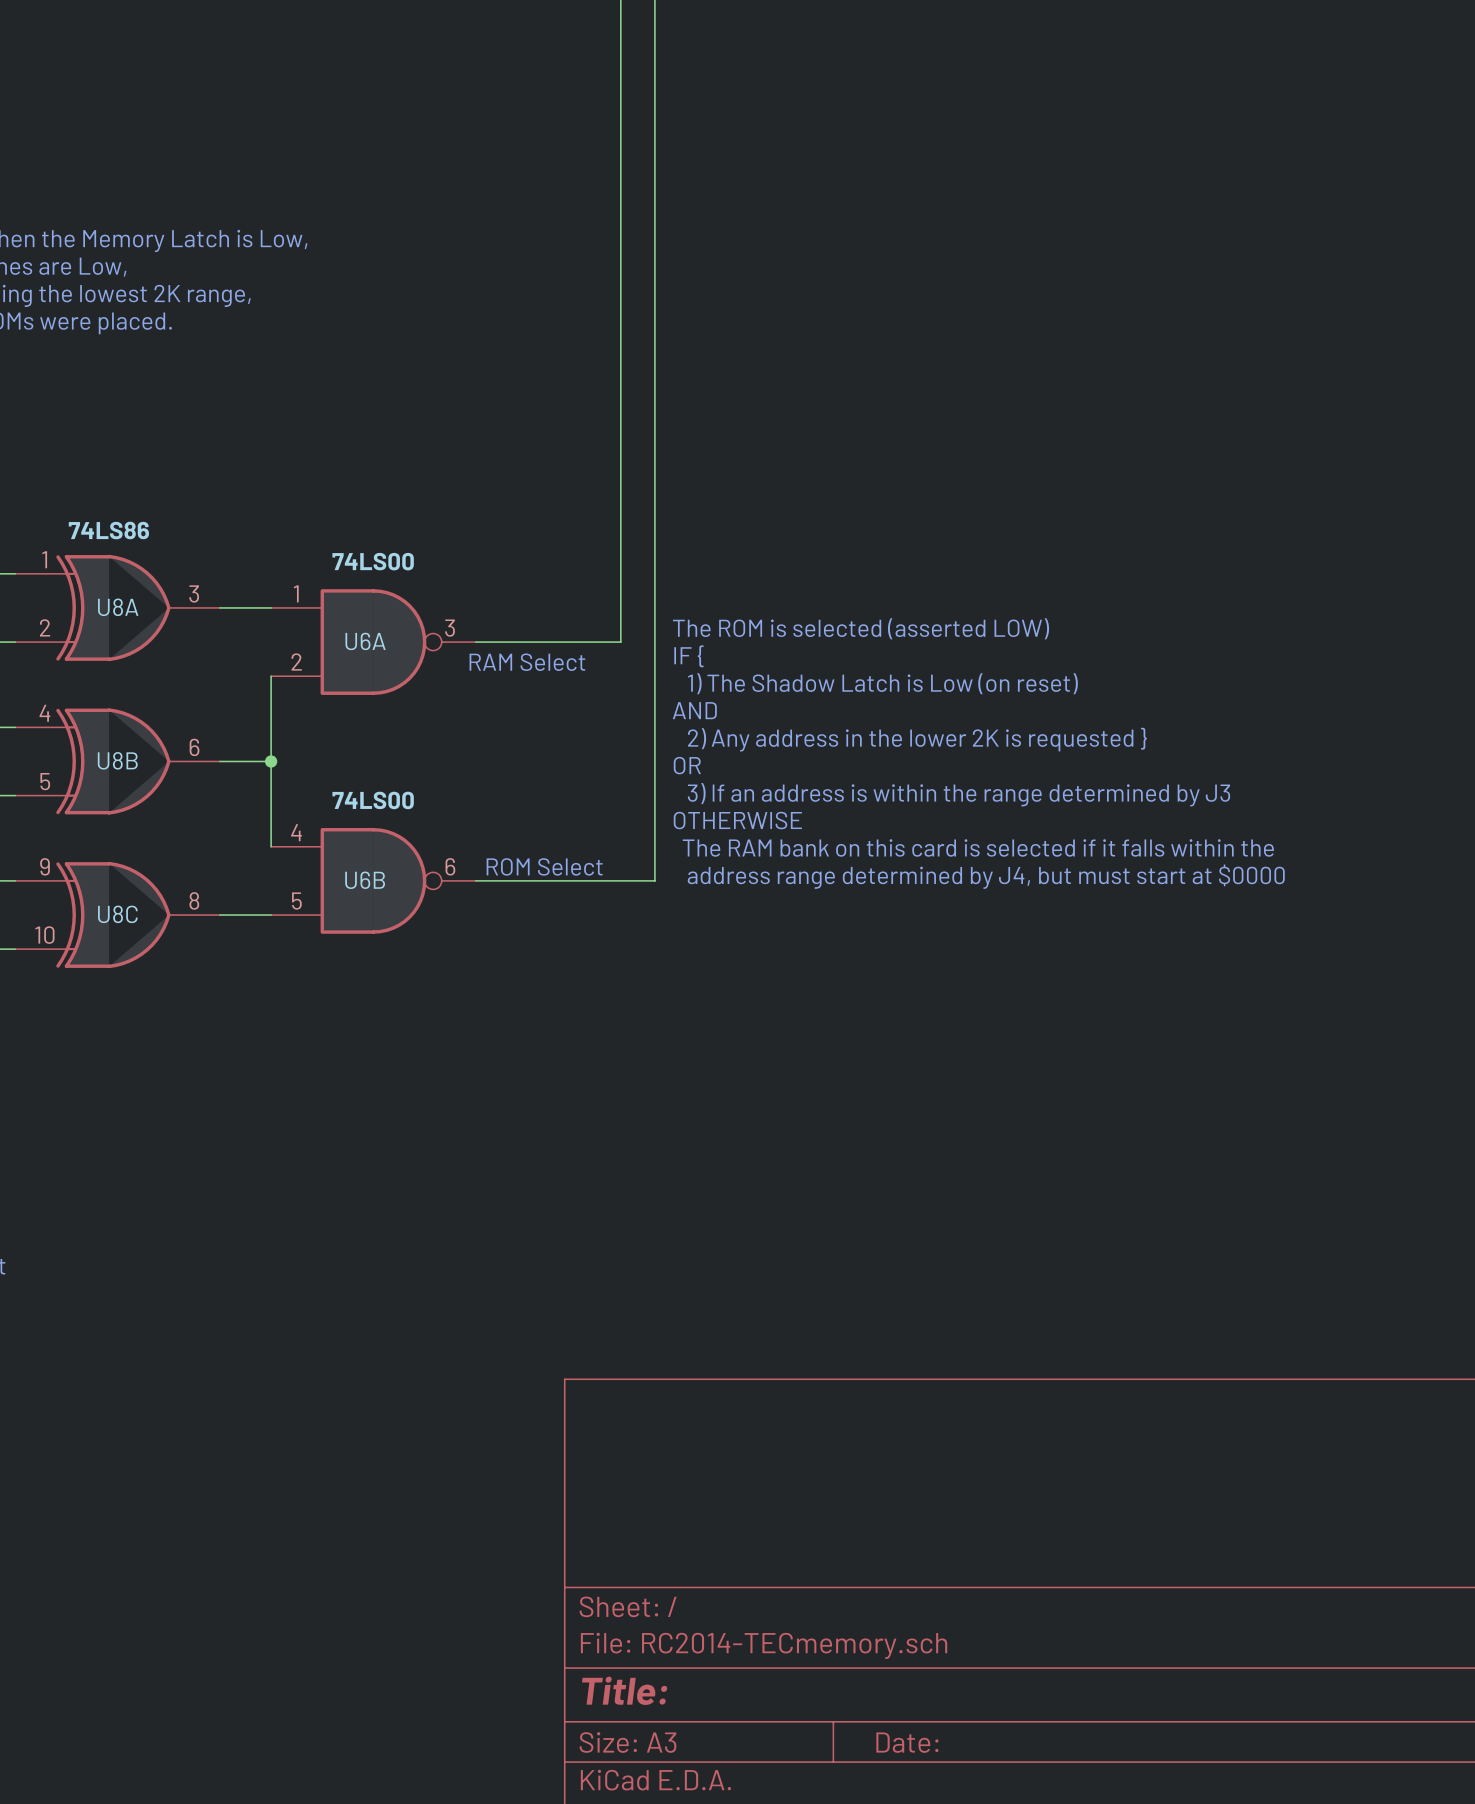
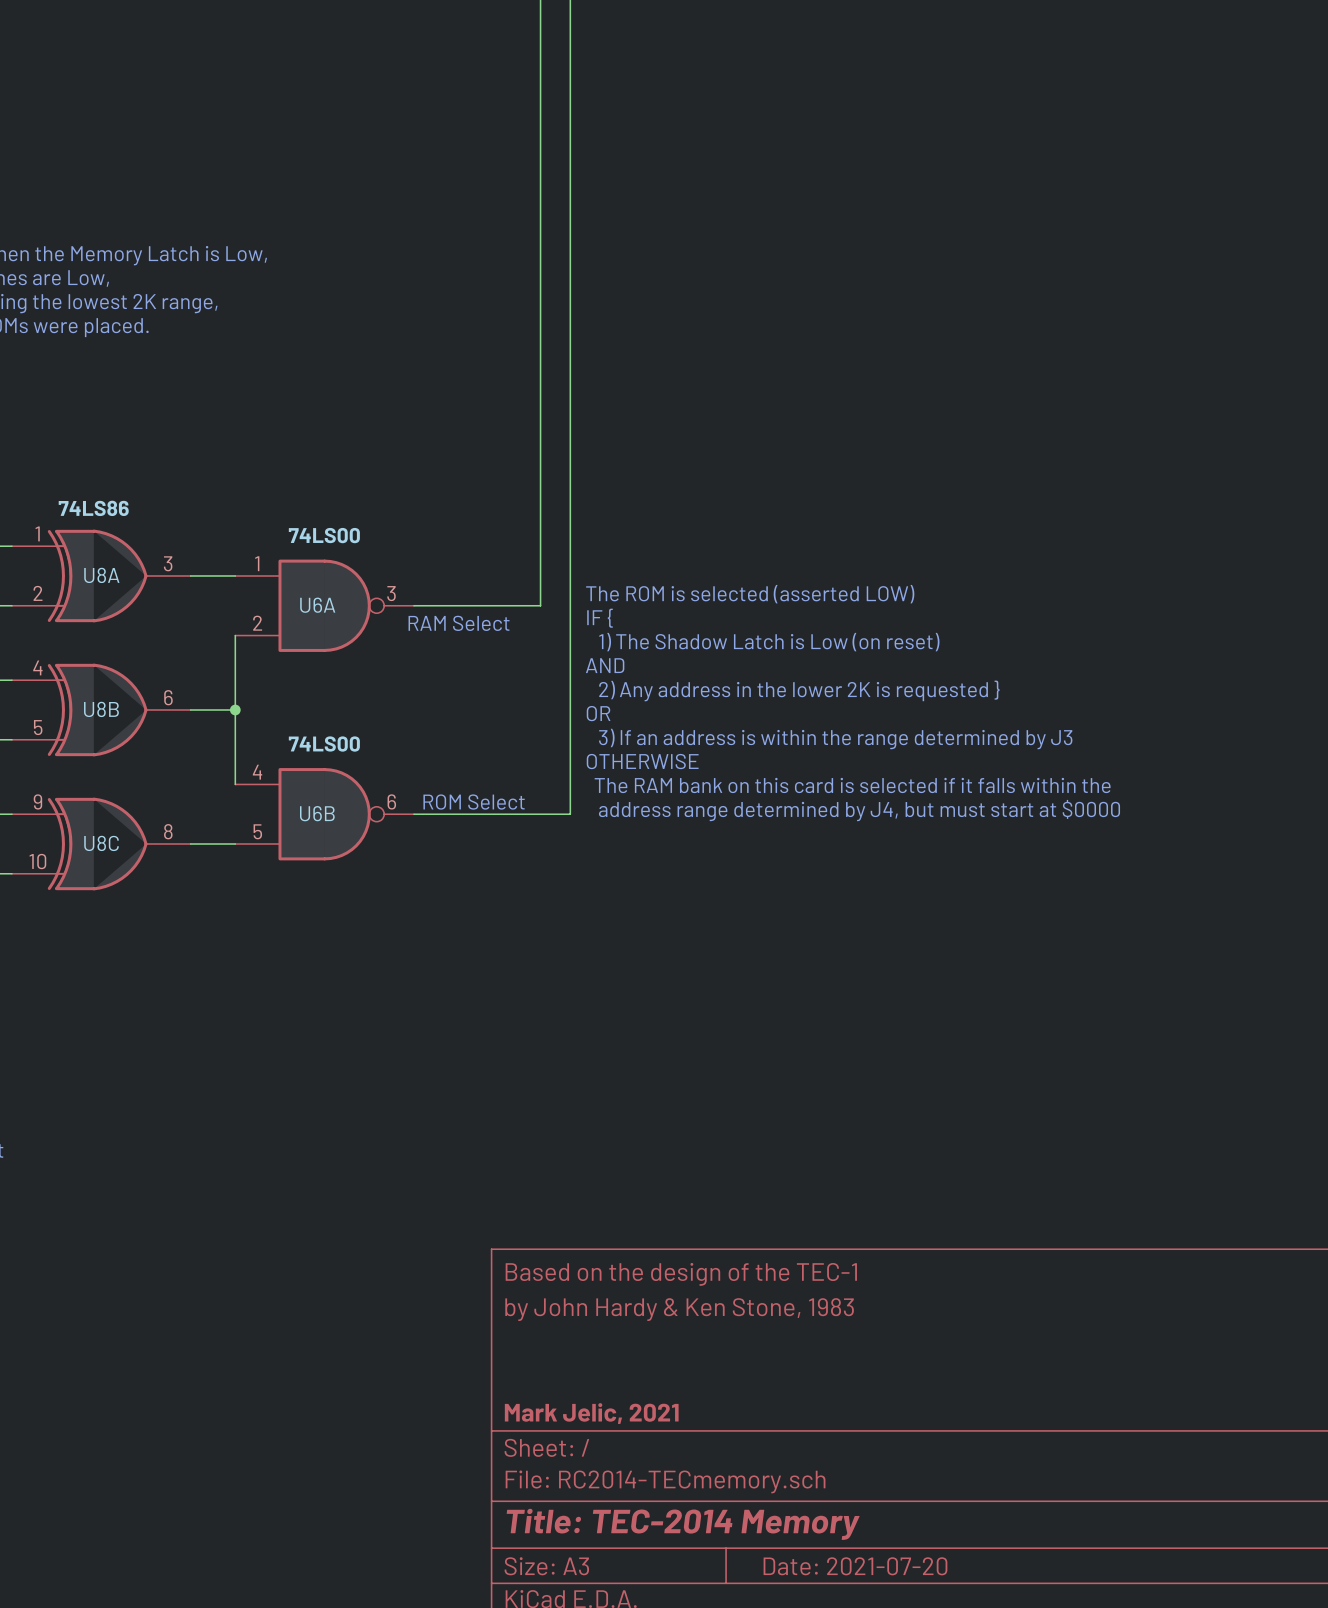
title block: none -> Based on the design of the TEC-1 (681, 1274)
title block: none -> by John Hardy & Ken Stone, 1983 (679, 1309)
title block: none -> Mark Jelic, 2021 (591, 1413)
title block: Title: (624, 1690) -> Title: TEC-2014 Memory (683, 1524)
title block: Date: (907, 1742) -> Date: 2021-07-20 (855, 1566)

